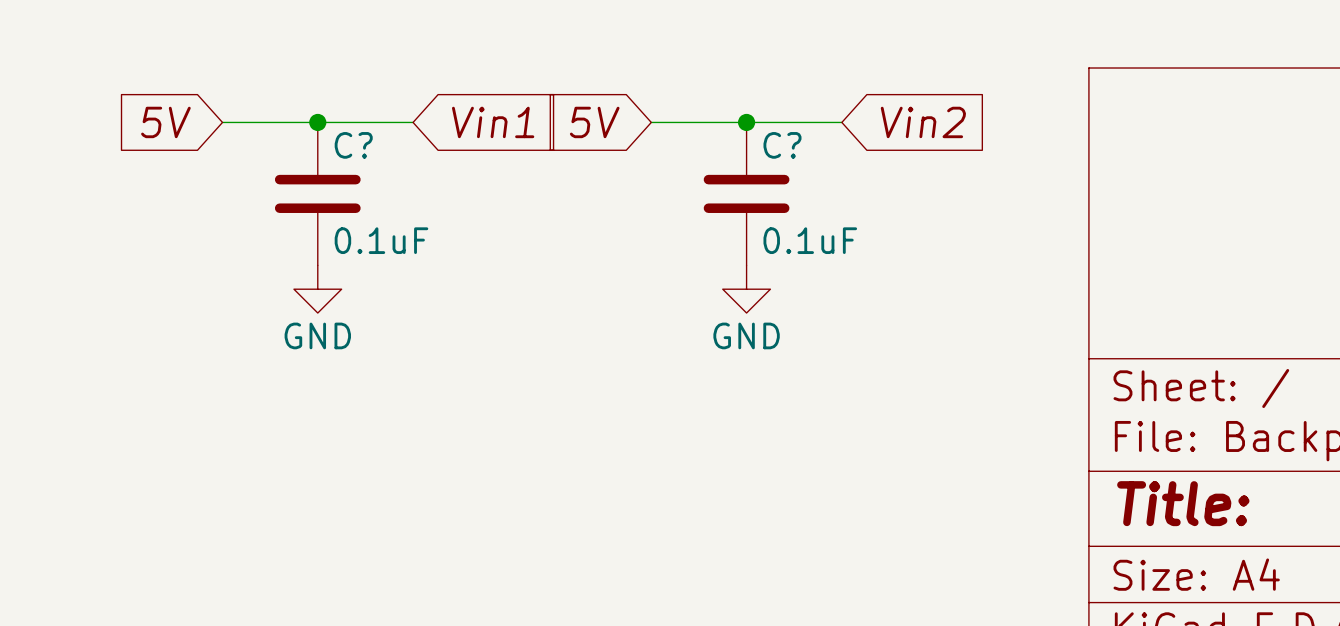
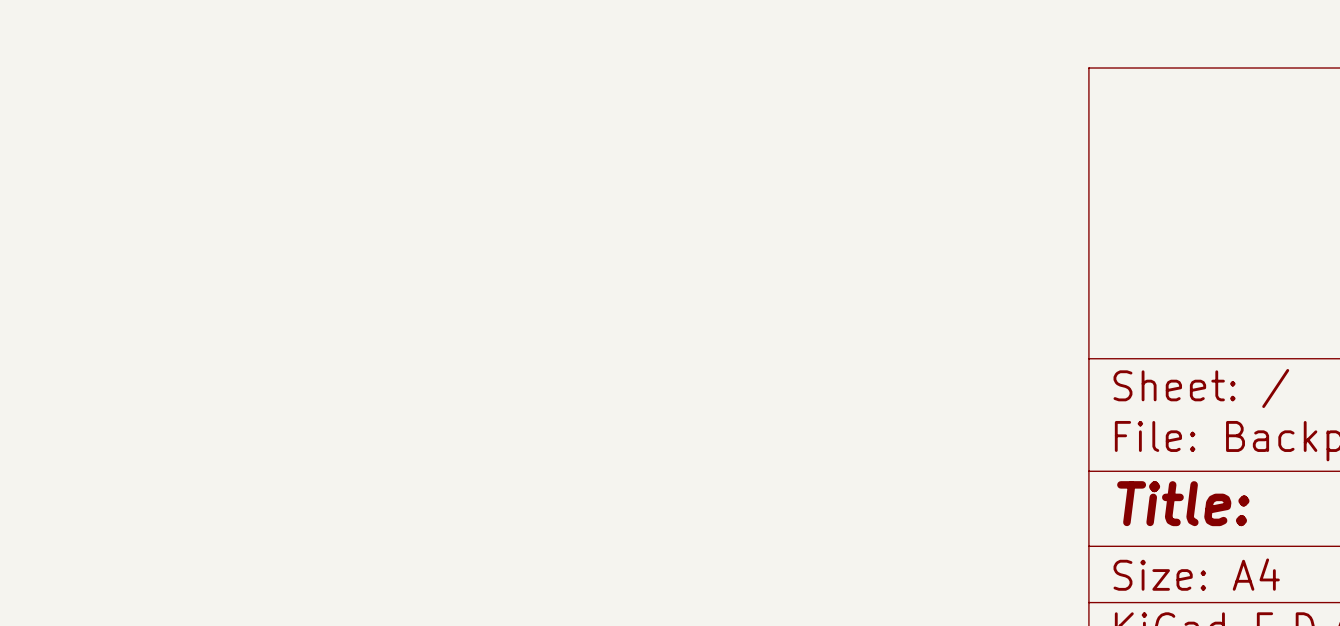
global label: 5V (165, 122) -> none
wire: (222, 122) (413, 122) -> none
junction: (317, 122) -> none
global label: Vin1 (493, 122) -> none
global label: 5V (594, 122) -> none
wire: (651, 122) (841, 122) -> none
junction: (746, 122) -> none
global label: Vin2 (923, 122) -> none
C?: 0.1uF (317, 193) -> none
C?: 0.1uF (746, 193) -> none
power symbol: GND (317, 289) -> none
power symbol: GND (746, 289) -> none

